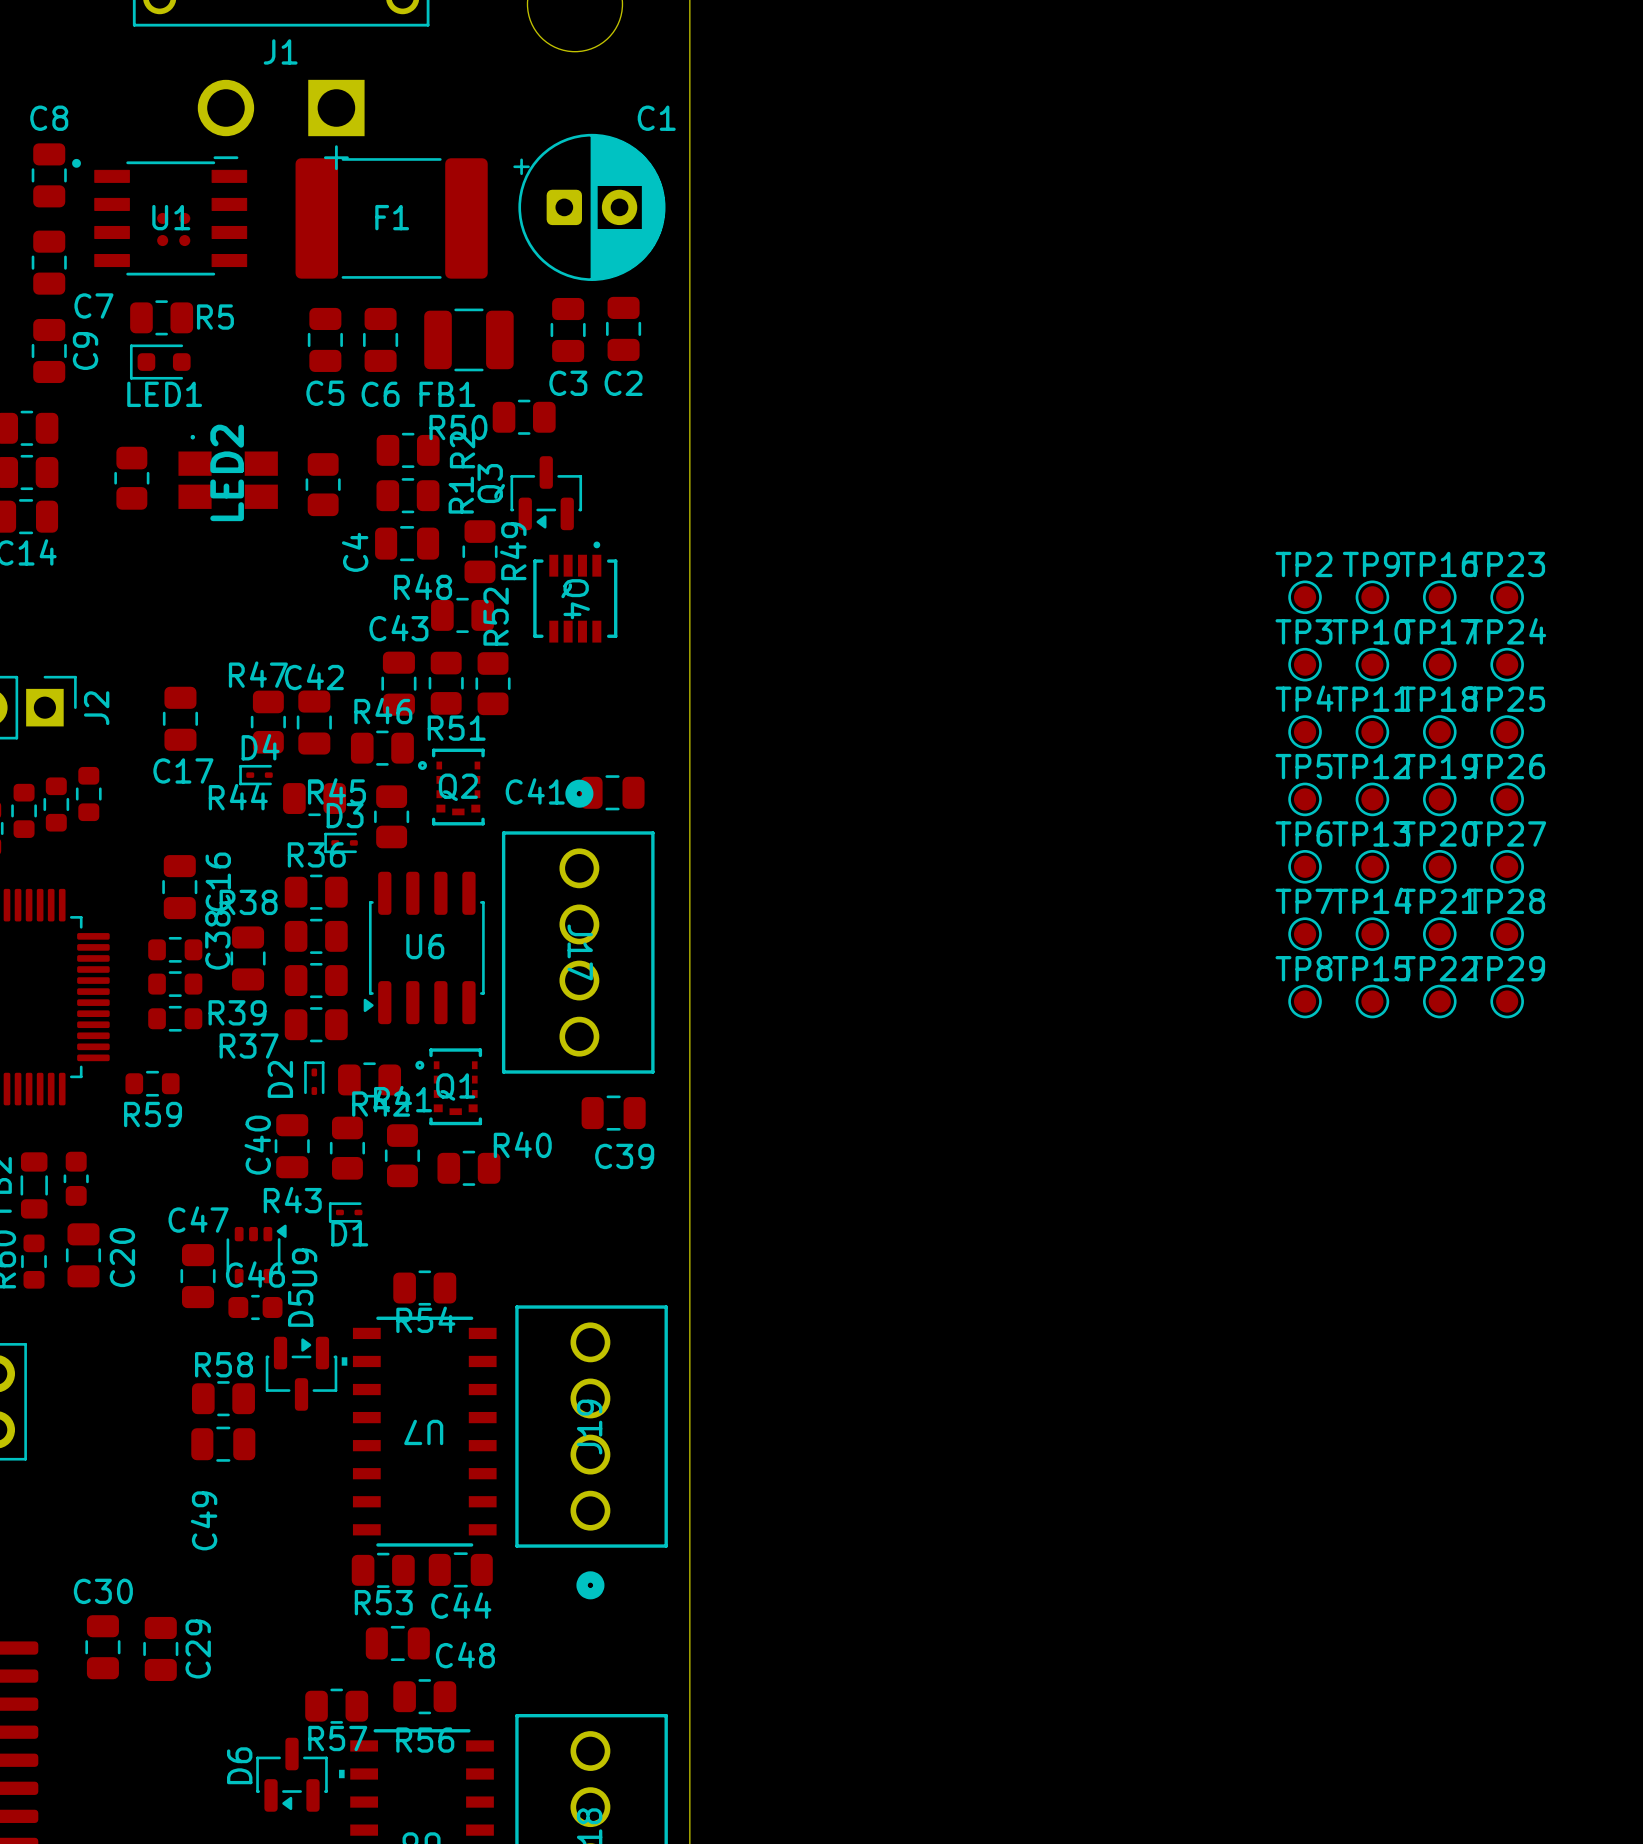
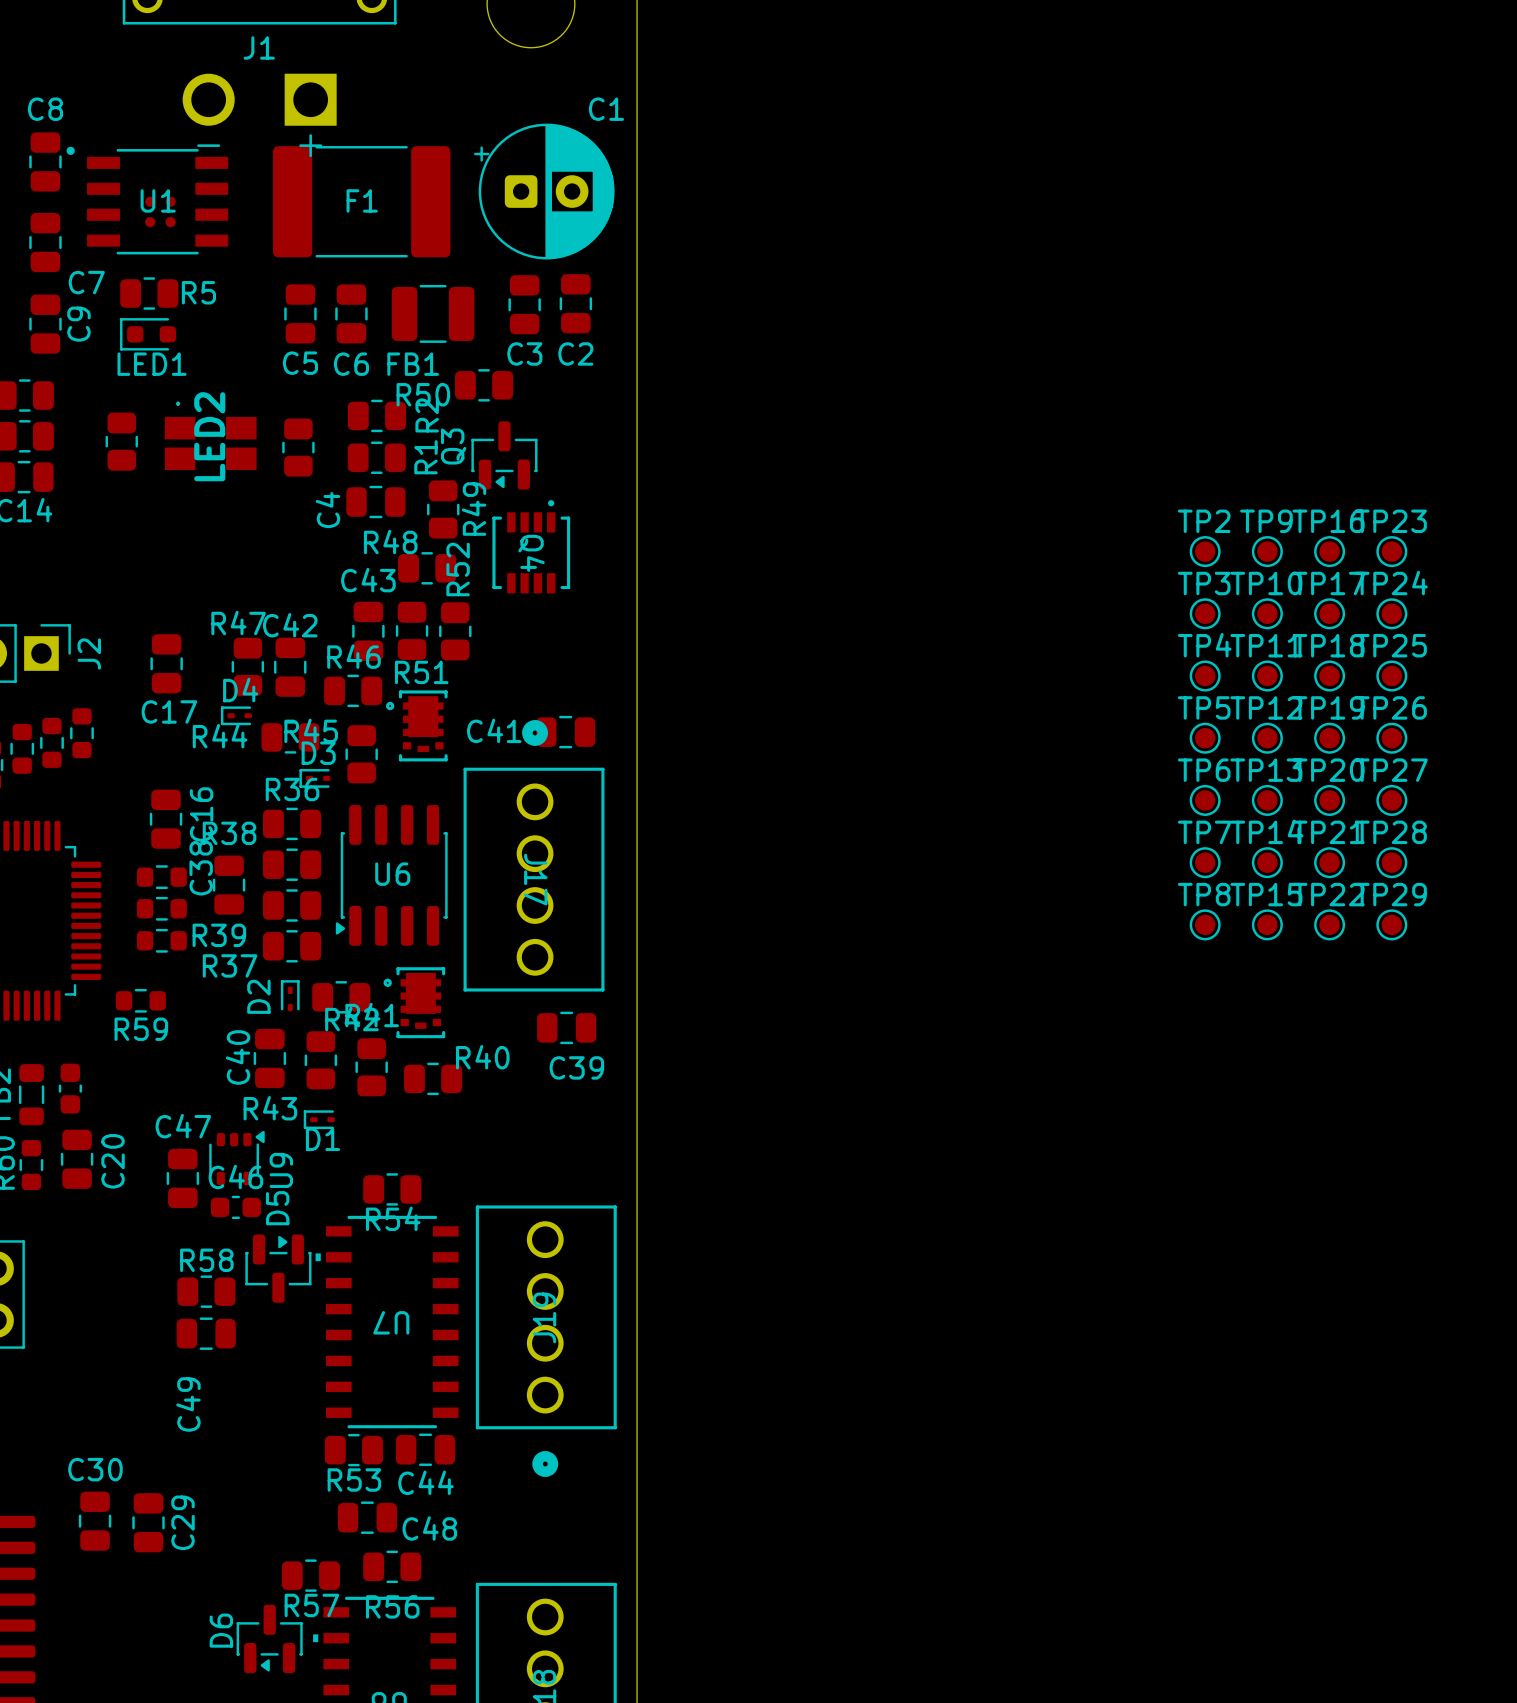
part: none -> (416, 725)
Q2: (451, 787) -> none
part: none -> (414, 1002)
Q1: (448, 1086) -> none

